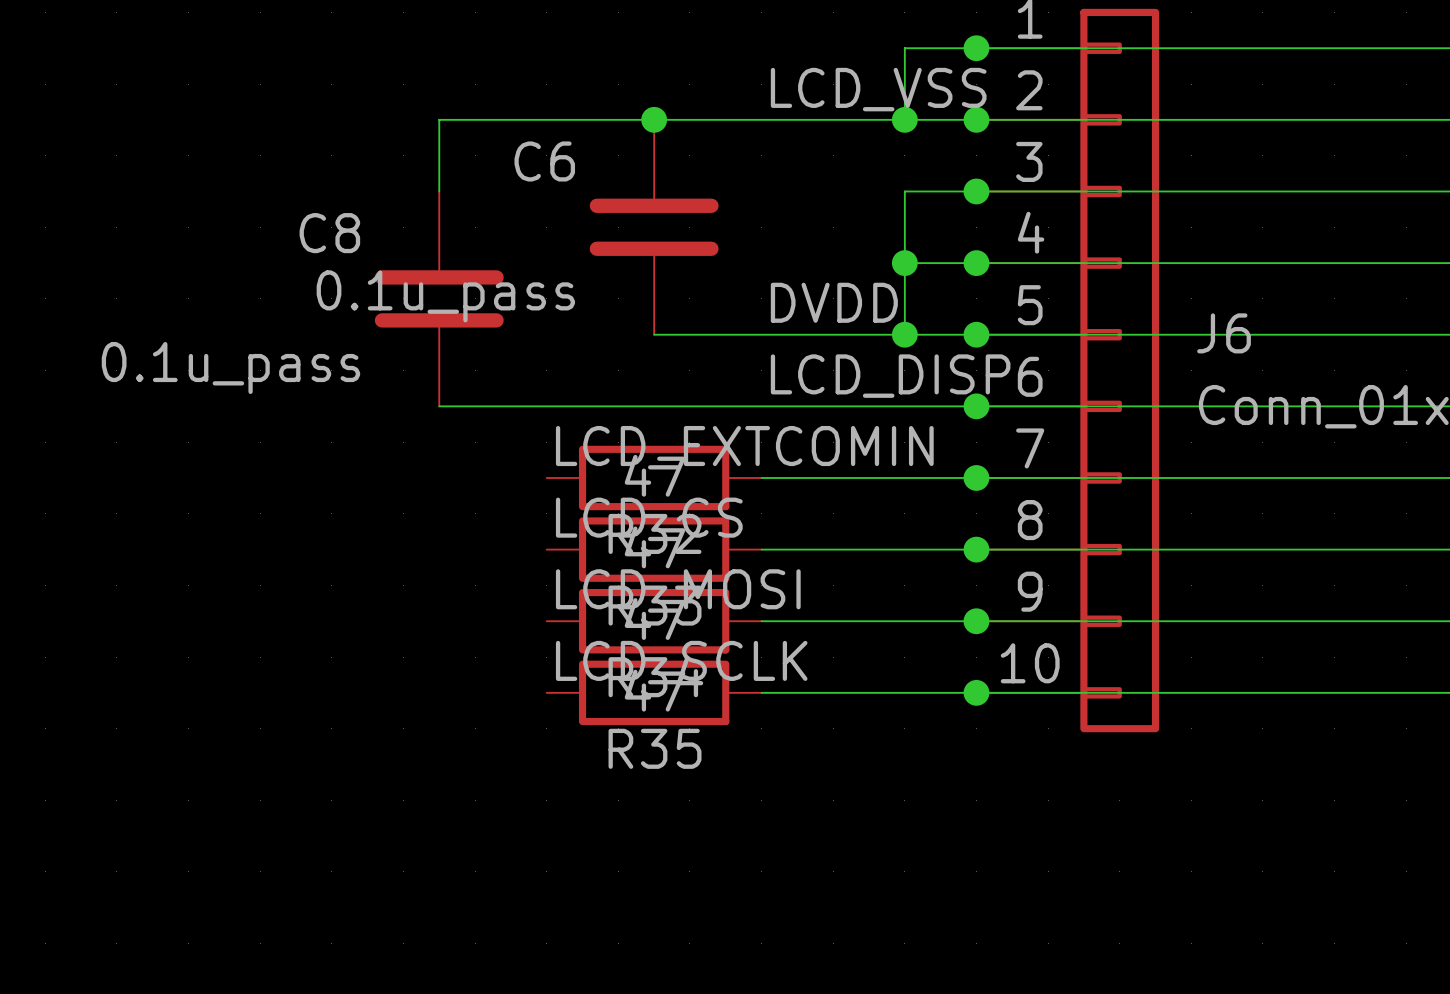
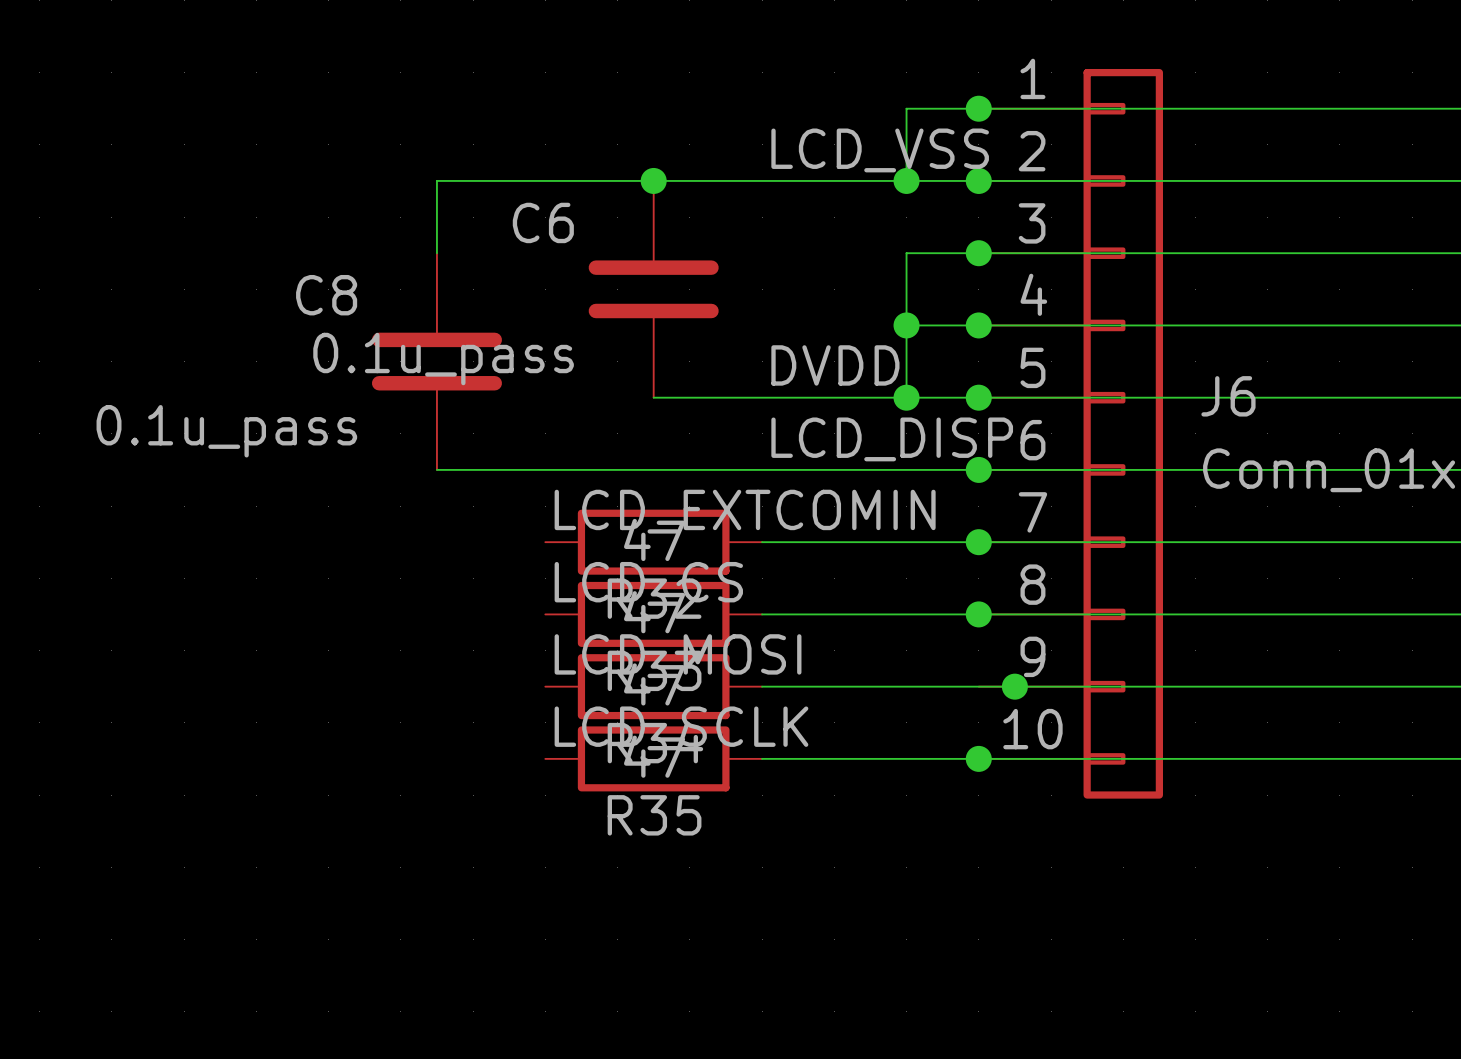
junction position: (976, 621) -> (1014, 686)

